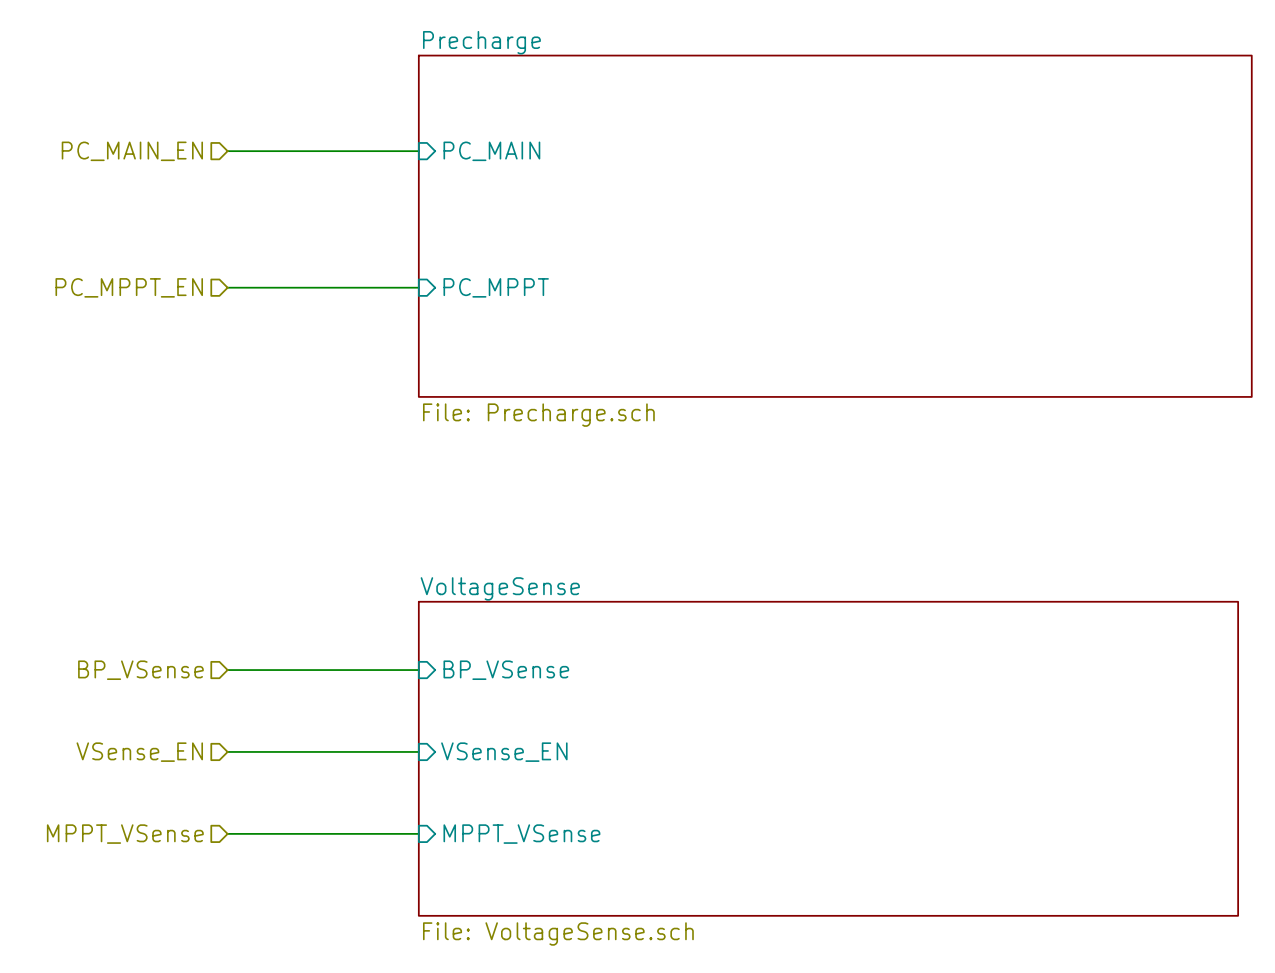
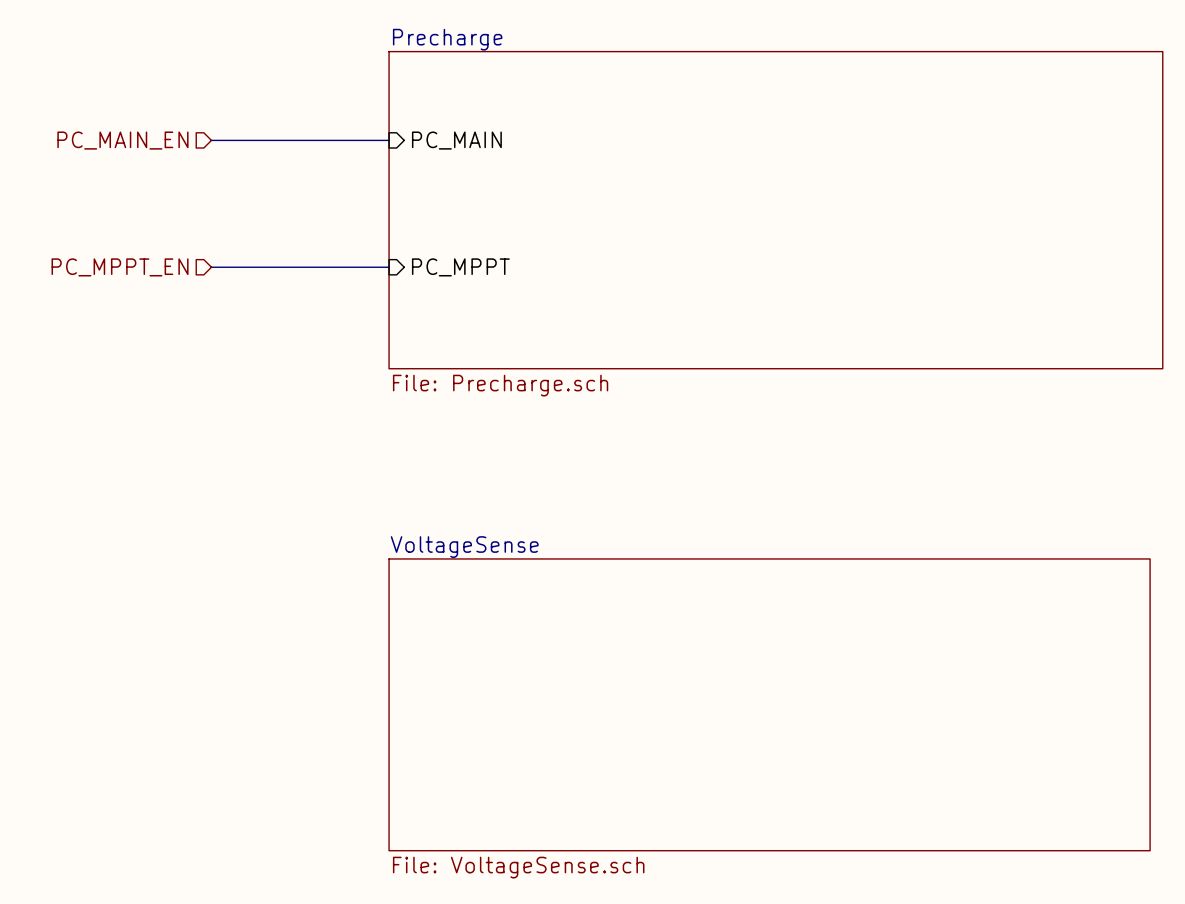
hierarchical label: BP_VSense (140, 670) -> none
wire: (227, 670) (418, 670) -> none
sheet pin: BP_VSense (506, 670) -> none
wire: (227, 751) (418, 751) -> none
hierarchical label: VSense_EN (139, 752) -> none
sheet pin: VSense_EN (504, 752) -> none
wire: (227, 833) (418, 833) -> none
hierarchical label: MPPT_VSense (125, 834) -> none
sheet pin: MPPT_VSense (521, 834) -> none

